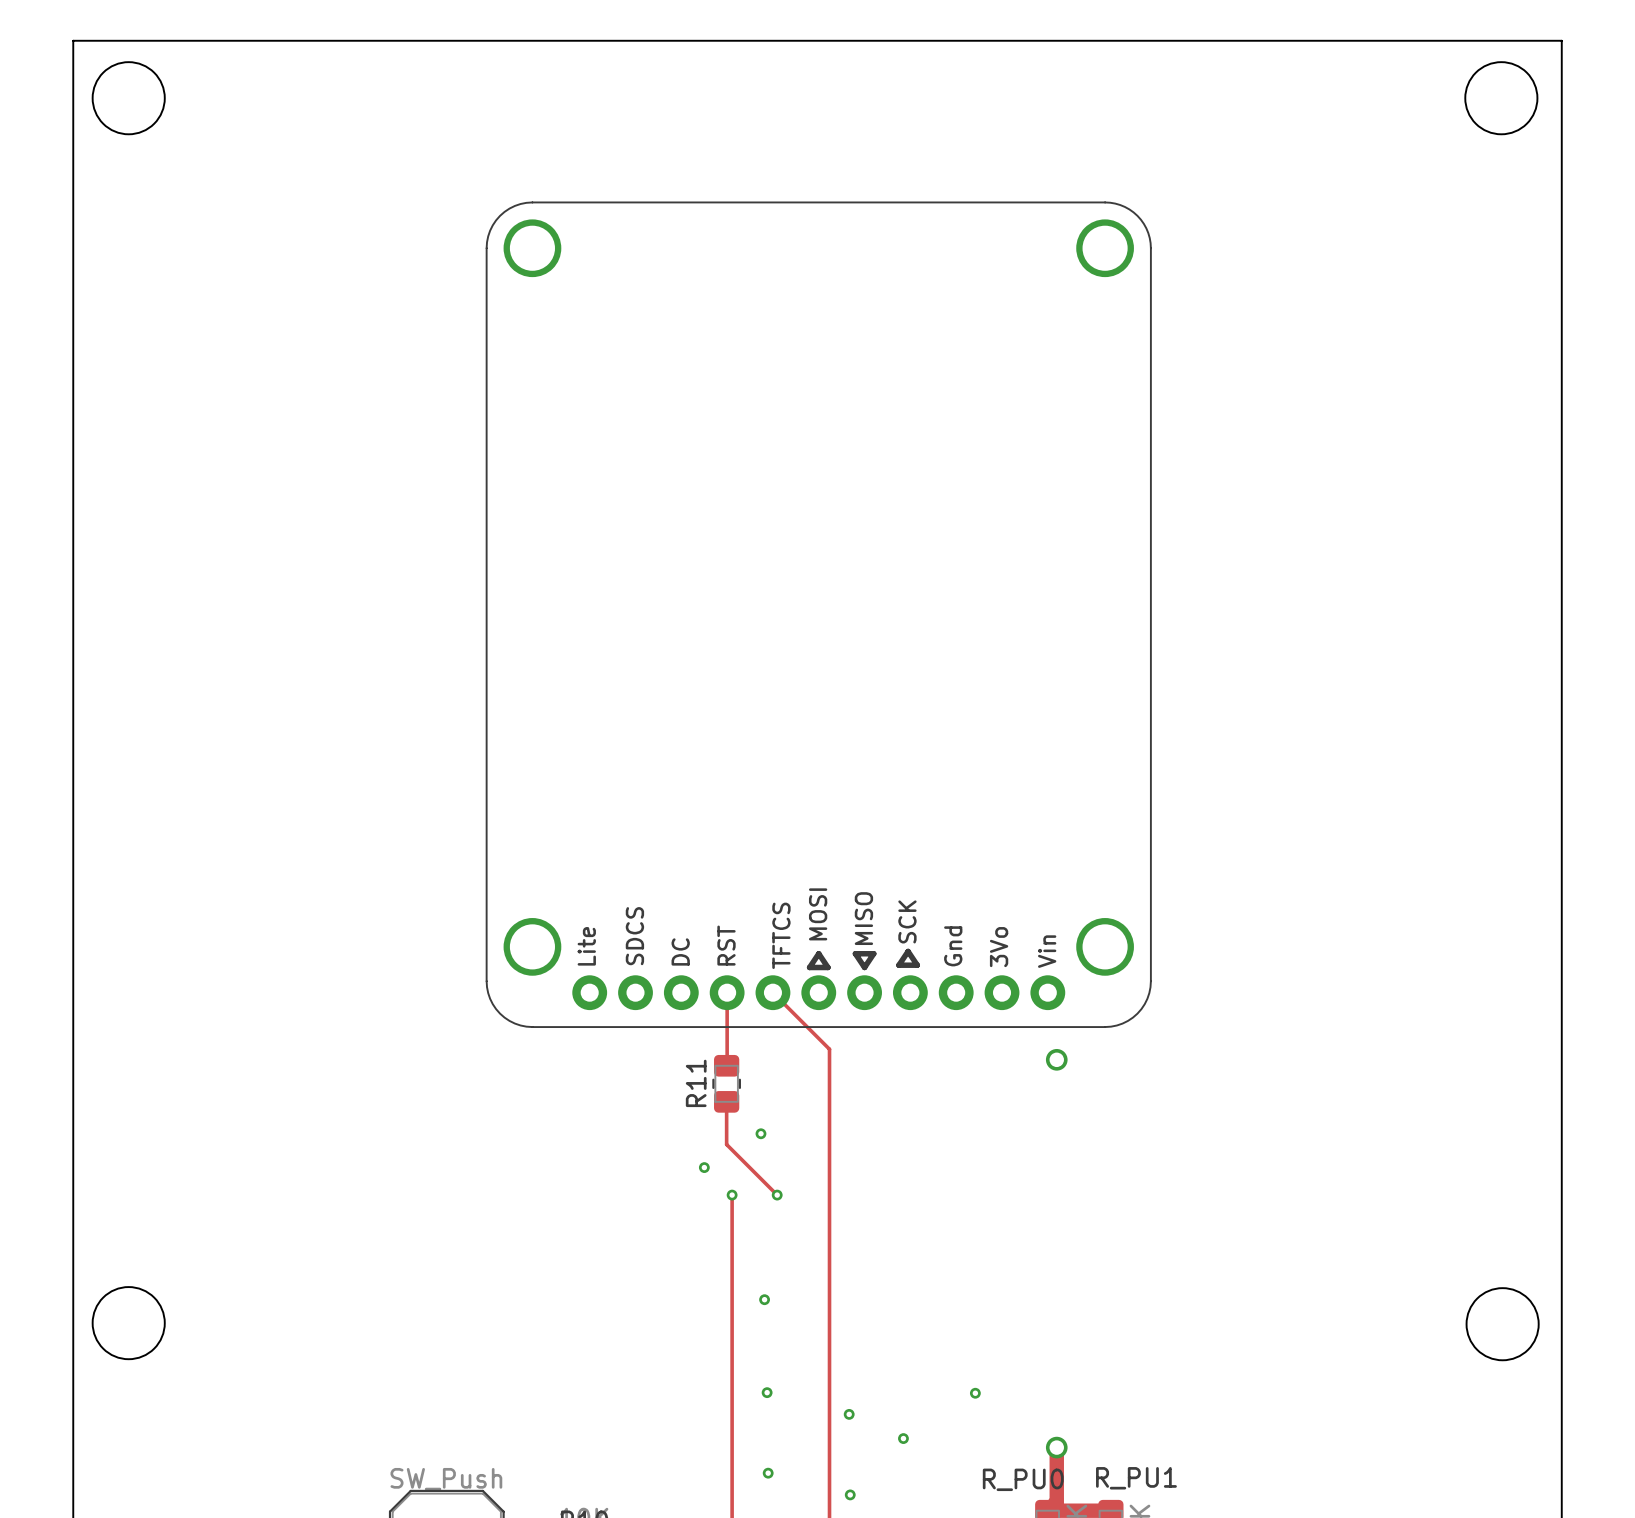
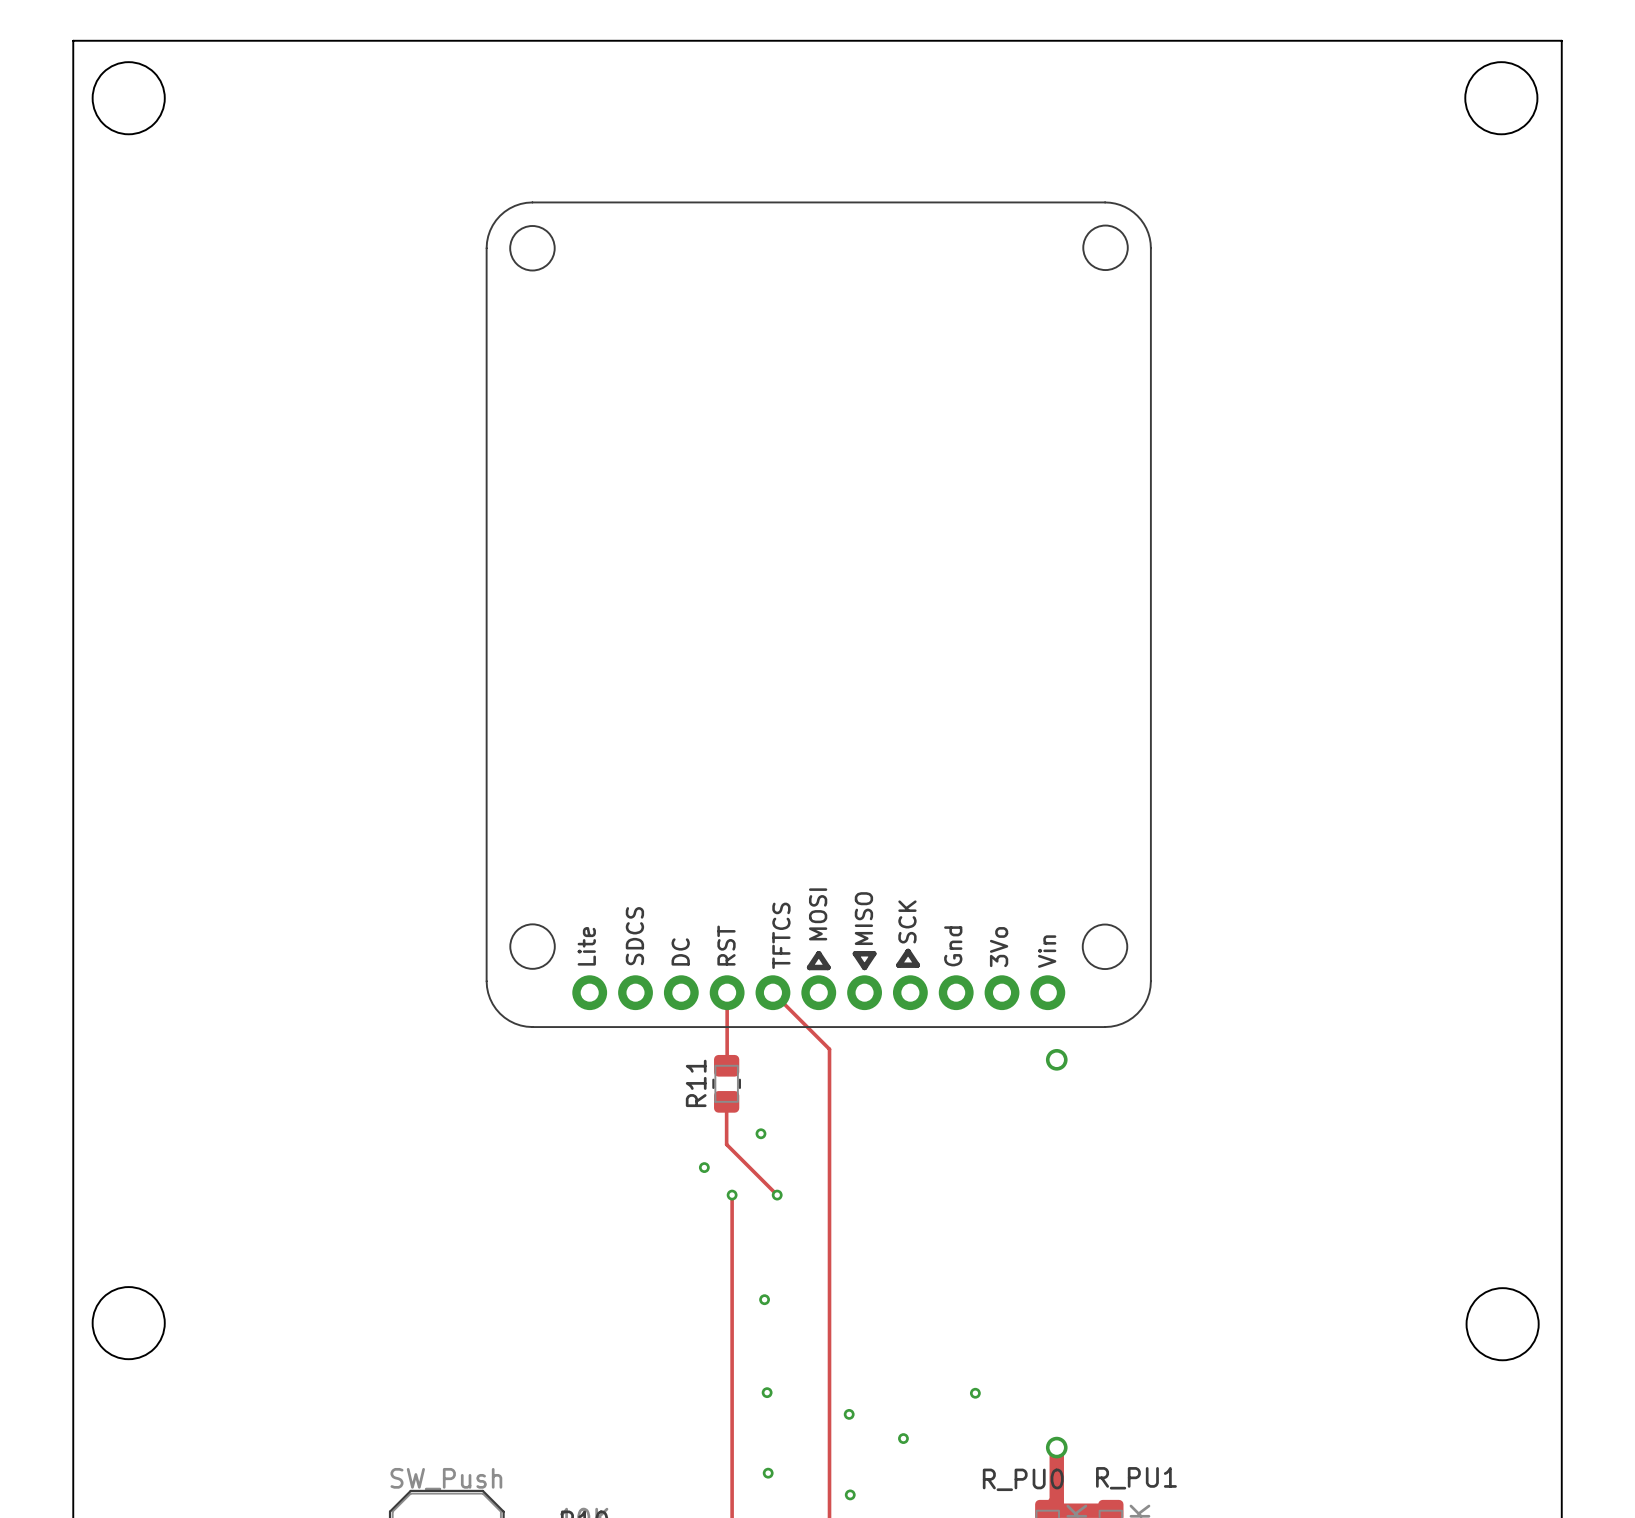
part footprint: [486, 201, 1152, 1028] -> [486, 201, 1152, 1028]

